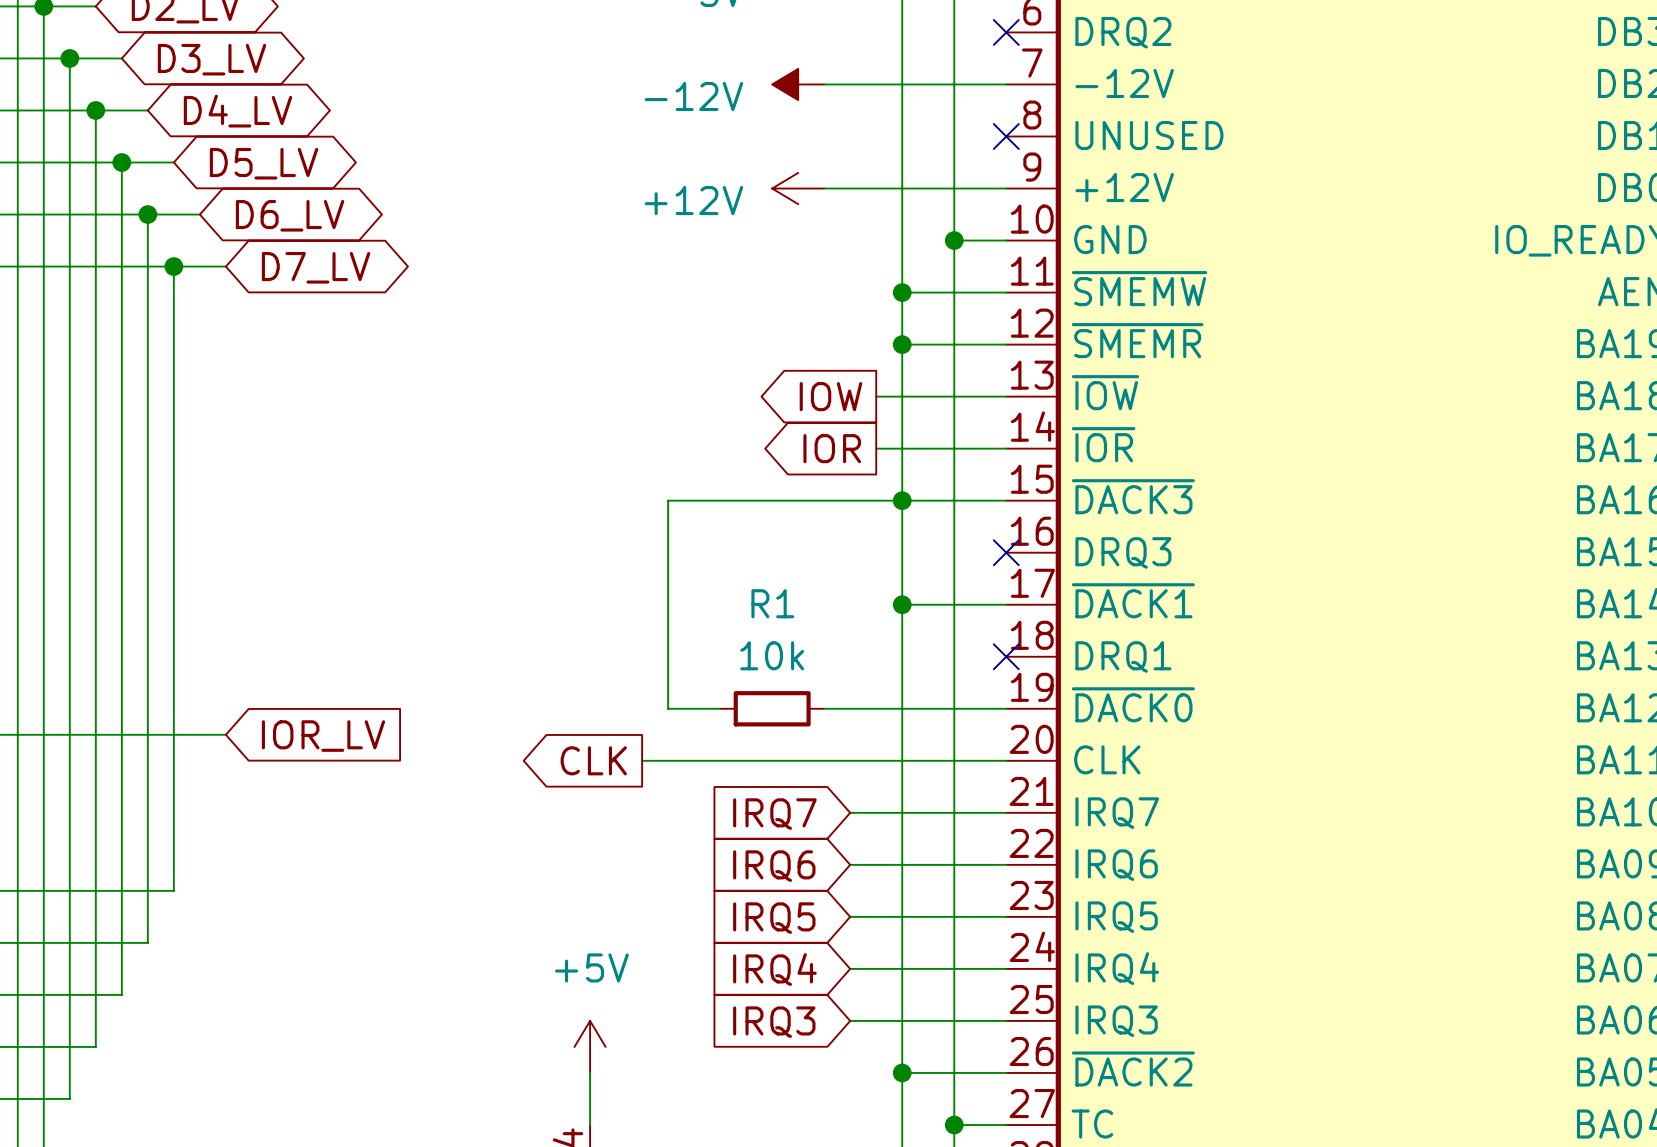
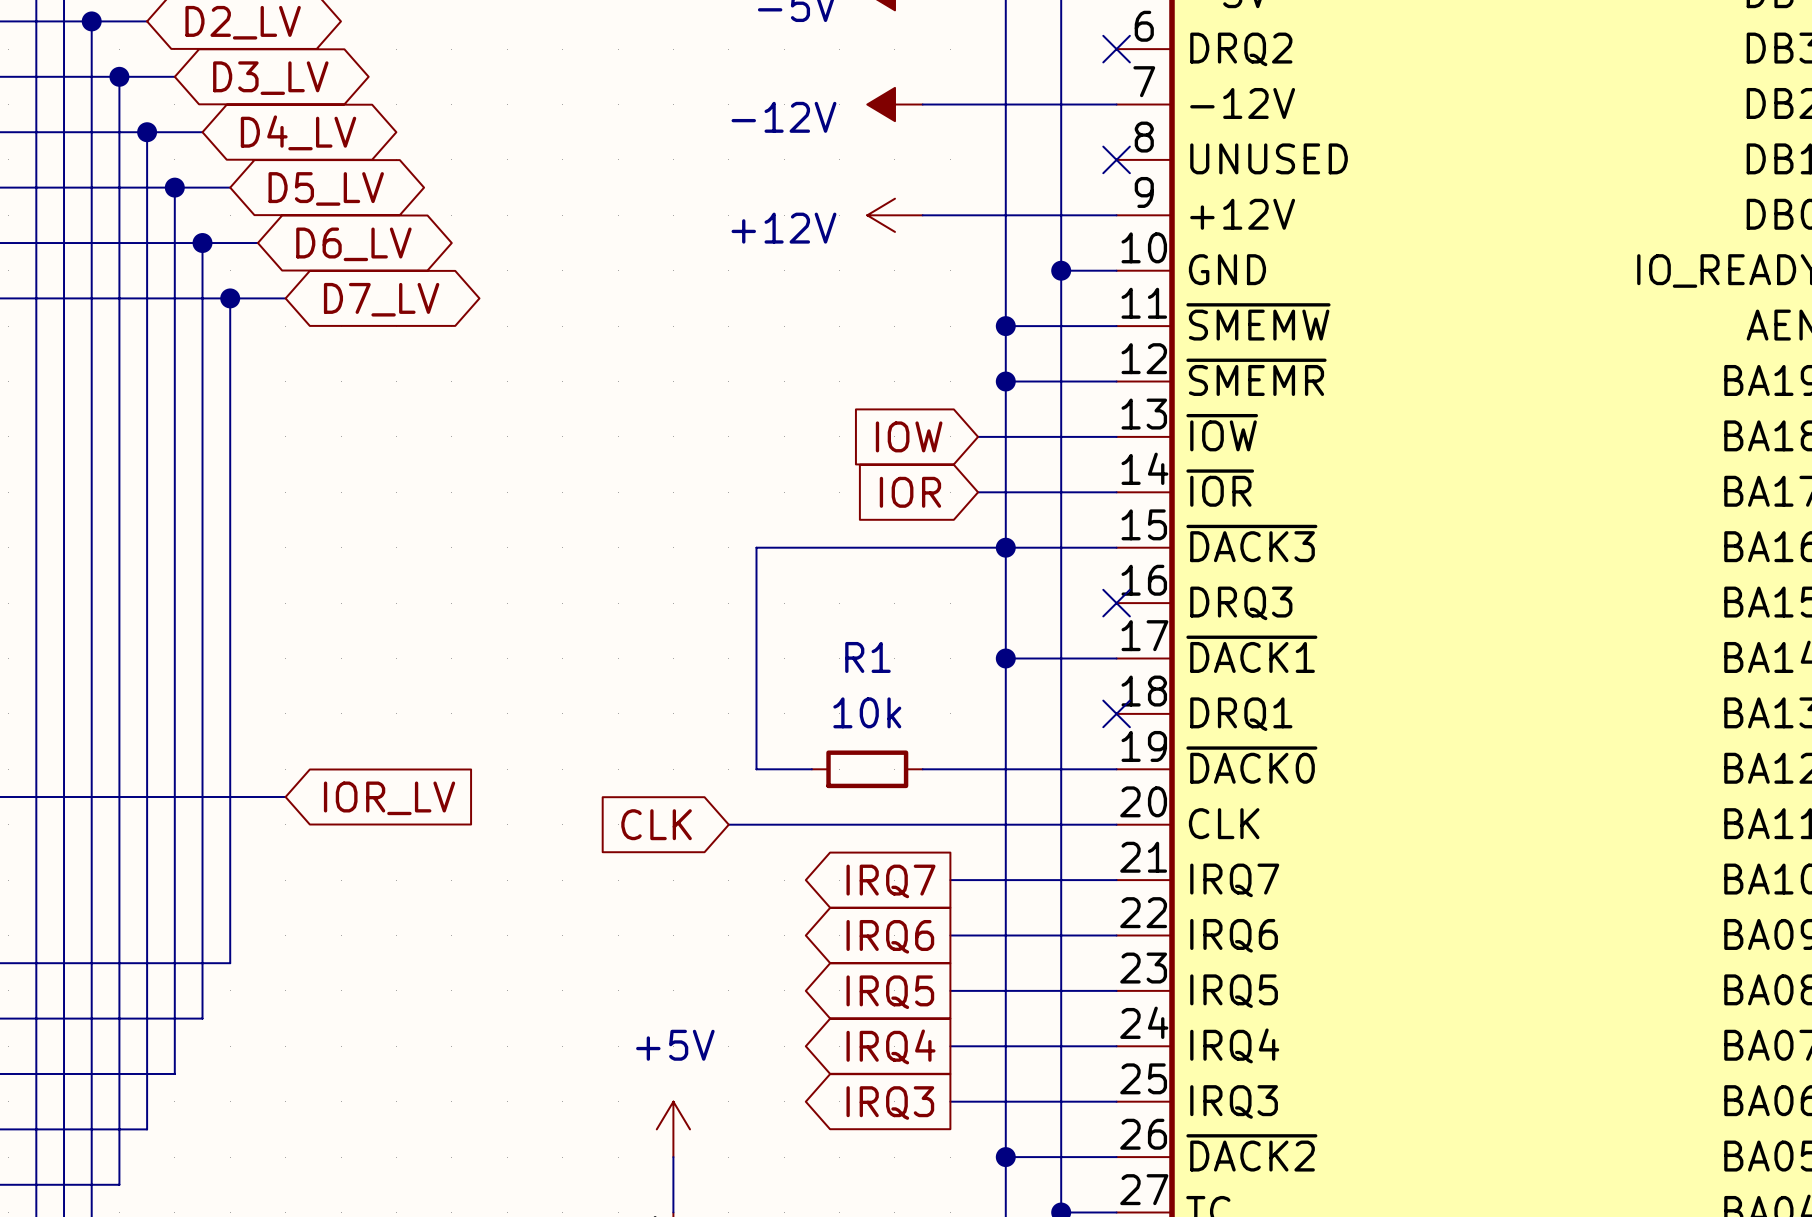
global label shape: output (830, 396) -> input (909, 436)
global label shape: output (832, 448) -> input (910, 492)
global label shape: output (593, 760) -> input (656, 824)
global label shape: input (774, 814) -> output (890, 881)
global label shape: input (774, 866) -> output (890, 936)
global label shape: input (774, 918) -> output (890, 992)
global label shape: input (774, 969) -> output (890, 1046)
global label shape: input (774, 1022) -> output (890, 1103)

